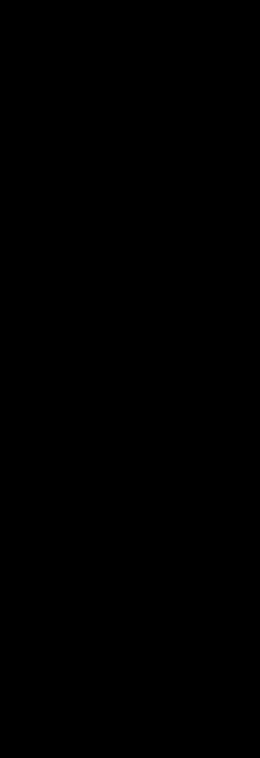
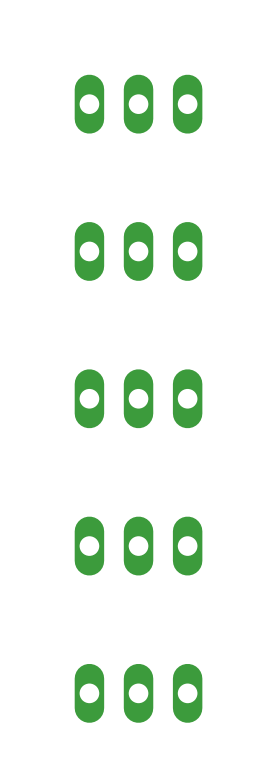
part: none -> (138, 104)
part: none -> (138, 251)
part: none -> (138, 398)
part: none -> (138, 546)
part: none -> (138, 693)

